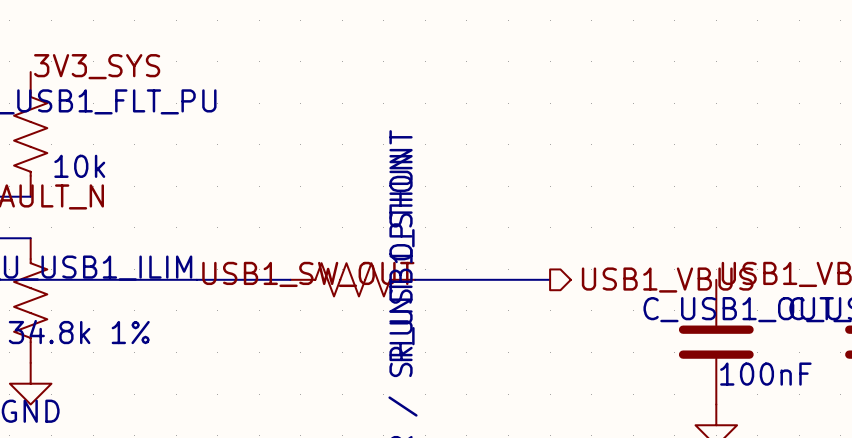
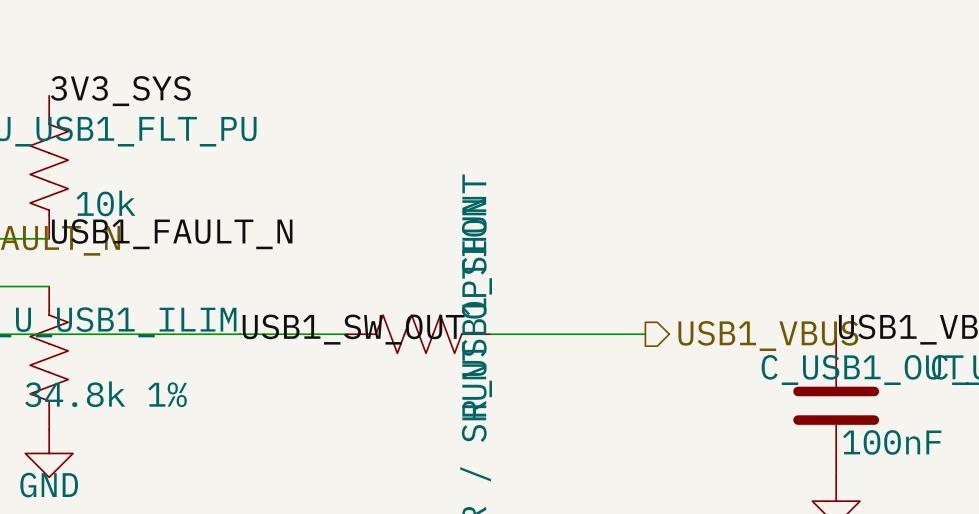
label: none -> USB1_FAULT_N (172, 234)

